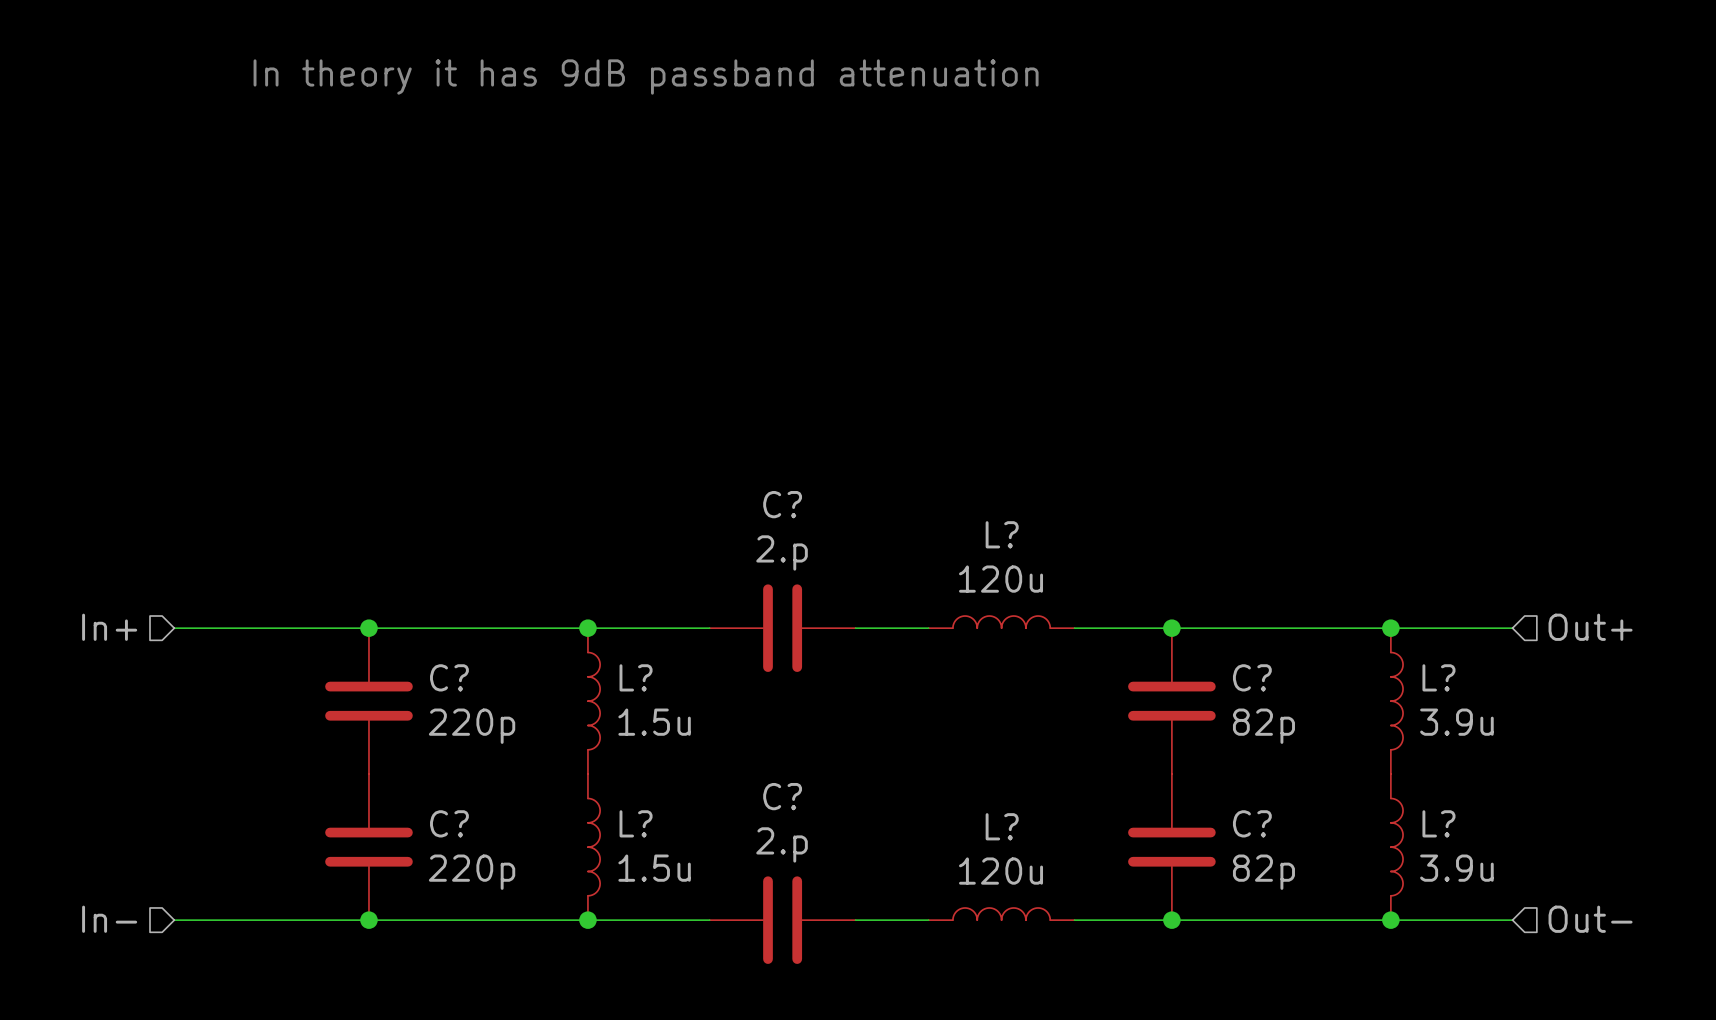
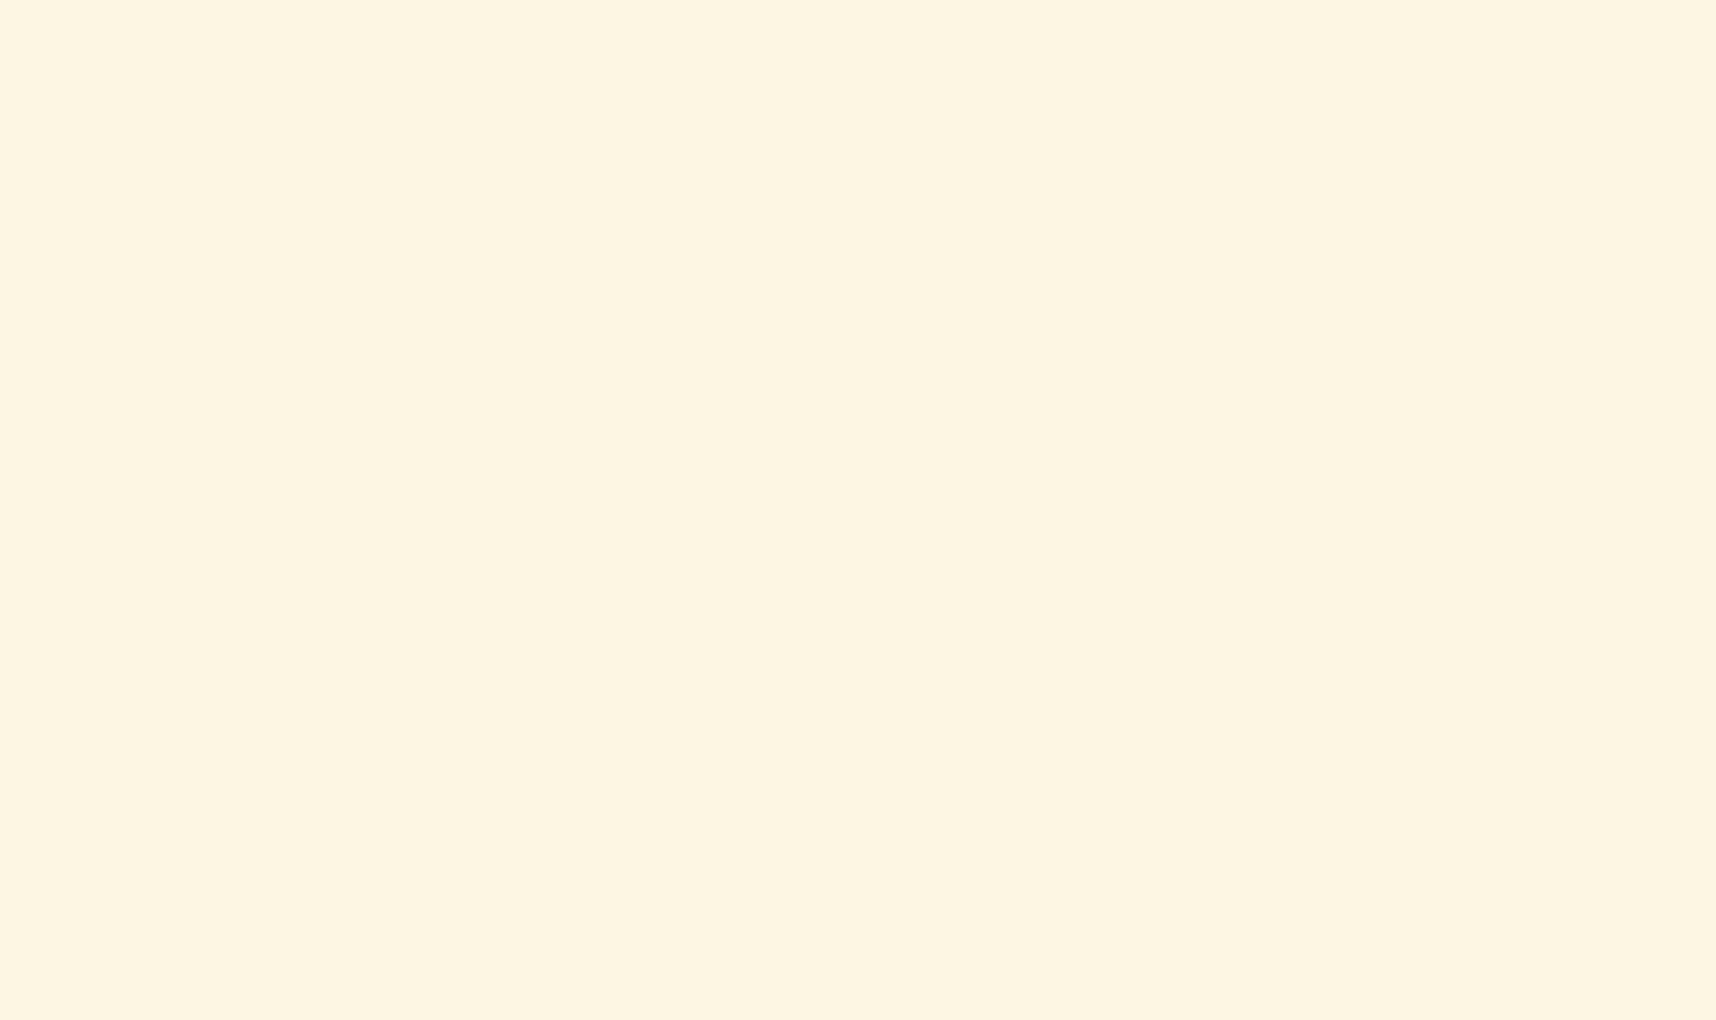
text: In theory it has 9dB passband attenuation (646, 77) -> none
L?: 120u (1001, 622) -> none
hierarchical label: In+ (109, 627) -> none
hierarchical label: Out+ (1590, 627) -> none
wire: (174, 628) (709, 628) -> none
junction: (368, 628) -> none
junction: (587, 628) -> none
C?: 2.p (782, 628) -> none
wire: (855, 628) (928, 628) -> none
wire: (1074, 628) (1512, 628) -> none
junction: (1171, 628) -> none
junction: (1390, 628) -> none
C?: 220p (368, 701) -> none
L?: 1.5u (594, 701) -> none
C?: 82p (1171, 701) -> none
L?: 3.9u (1396, 701) -> none
C?: 220p (368, 847) -> none
L?: 1.5u (594, 847) -> none
C?: 82p (1171, 847) -> none
L?: 3.9u (1396, 847) -> none
L?: 120u (1001, 914) -> none
hierarchical label: In- (109, 919) -> none
hierarchical label: Out- (1590, 919) -> none
wire: (174, 920) (709, 920) -> none
junction: (368, 920) -> none
junction: (587, 920) -> none
C?: 2.p (782, 920) -> none
wire: (855, 920) (928, 920) -> none
wire: (1074, 920) (1512, 920) -> none
junction: (1171, 920) -> none
junction: (1390, 920) -> none

